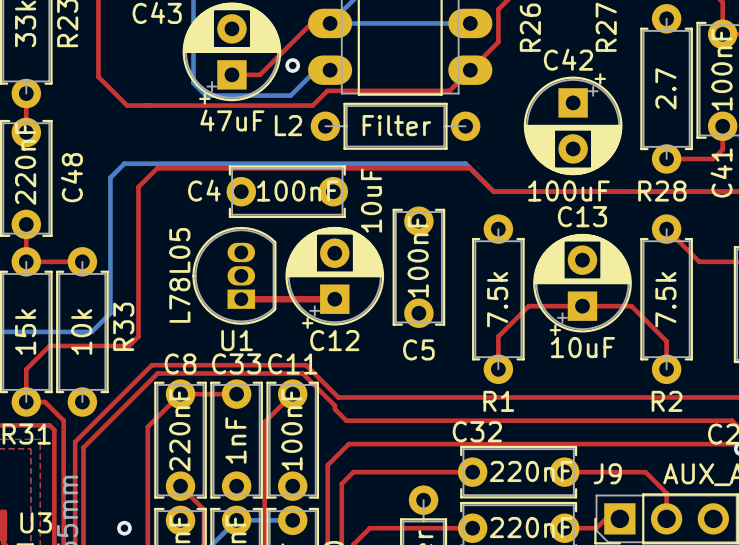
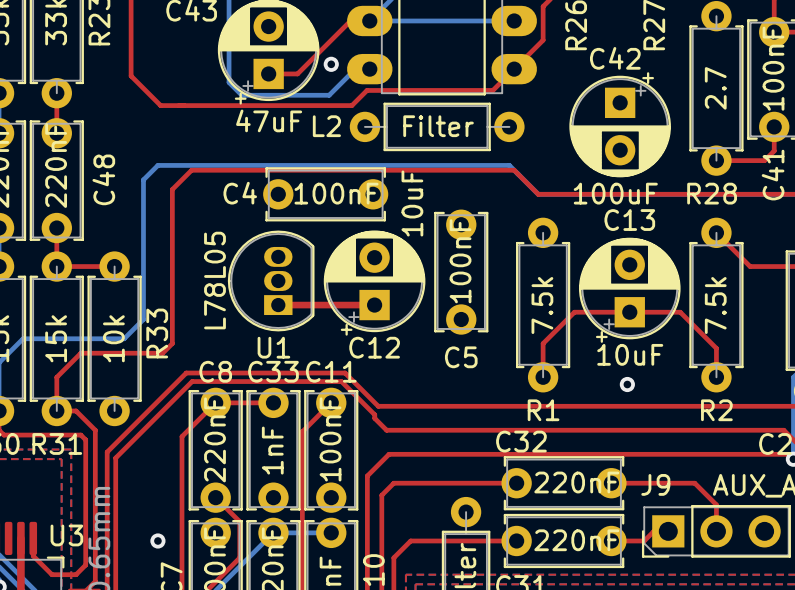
via: none -> (627, 384)

